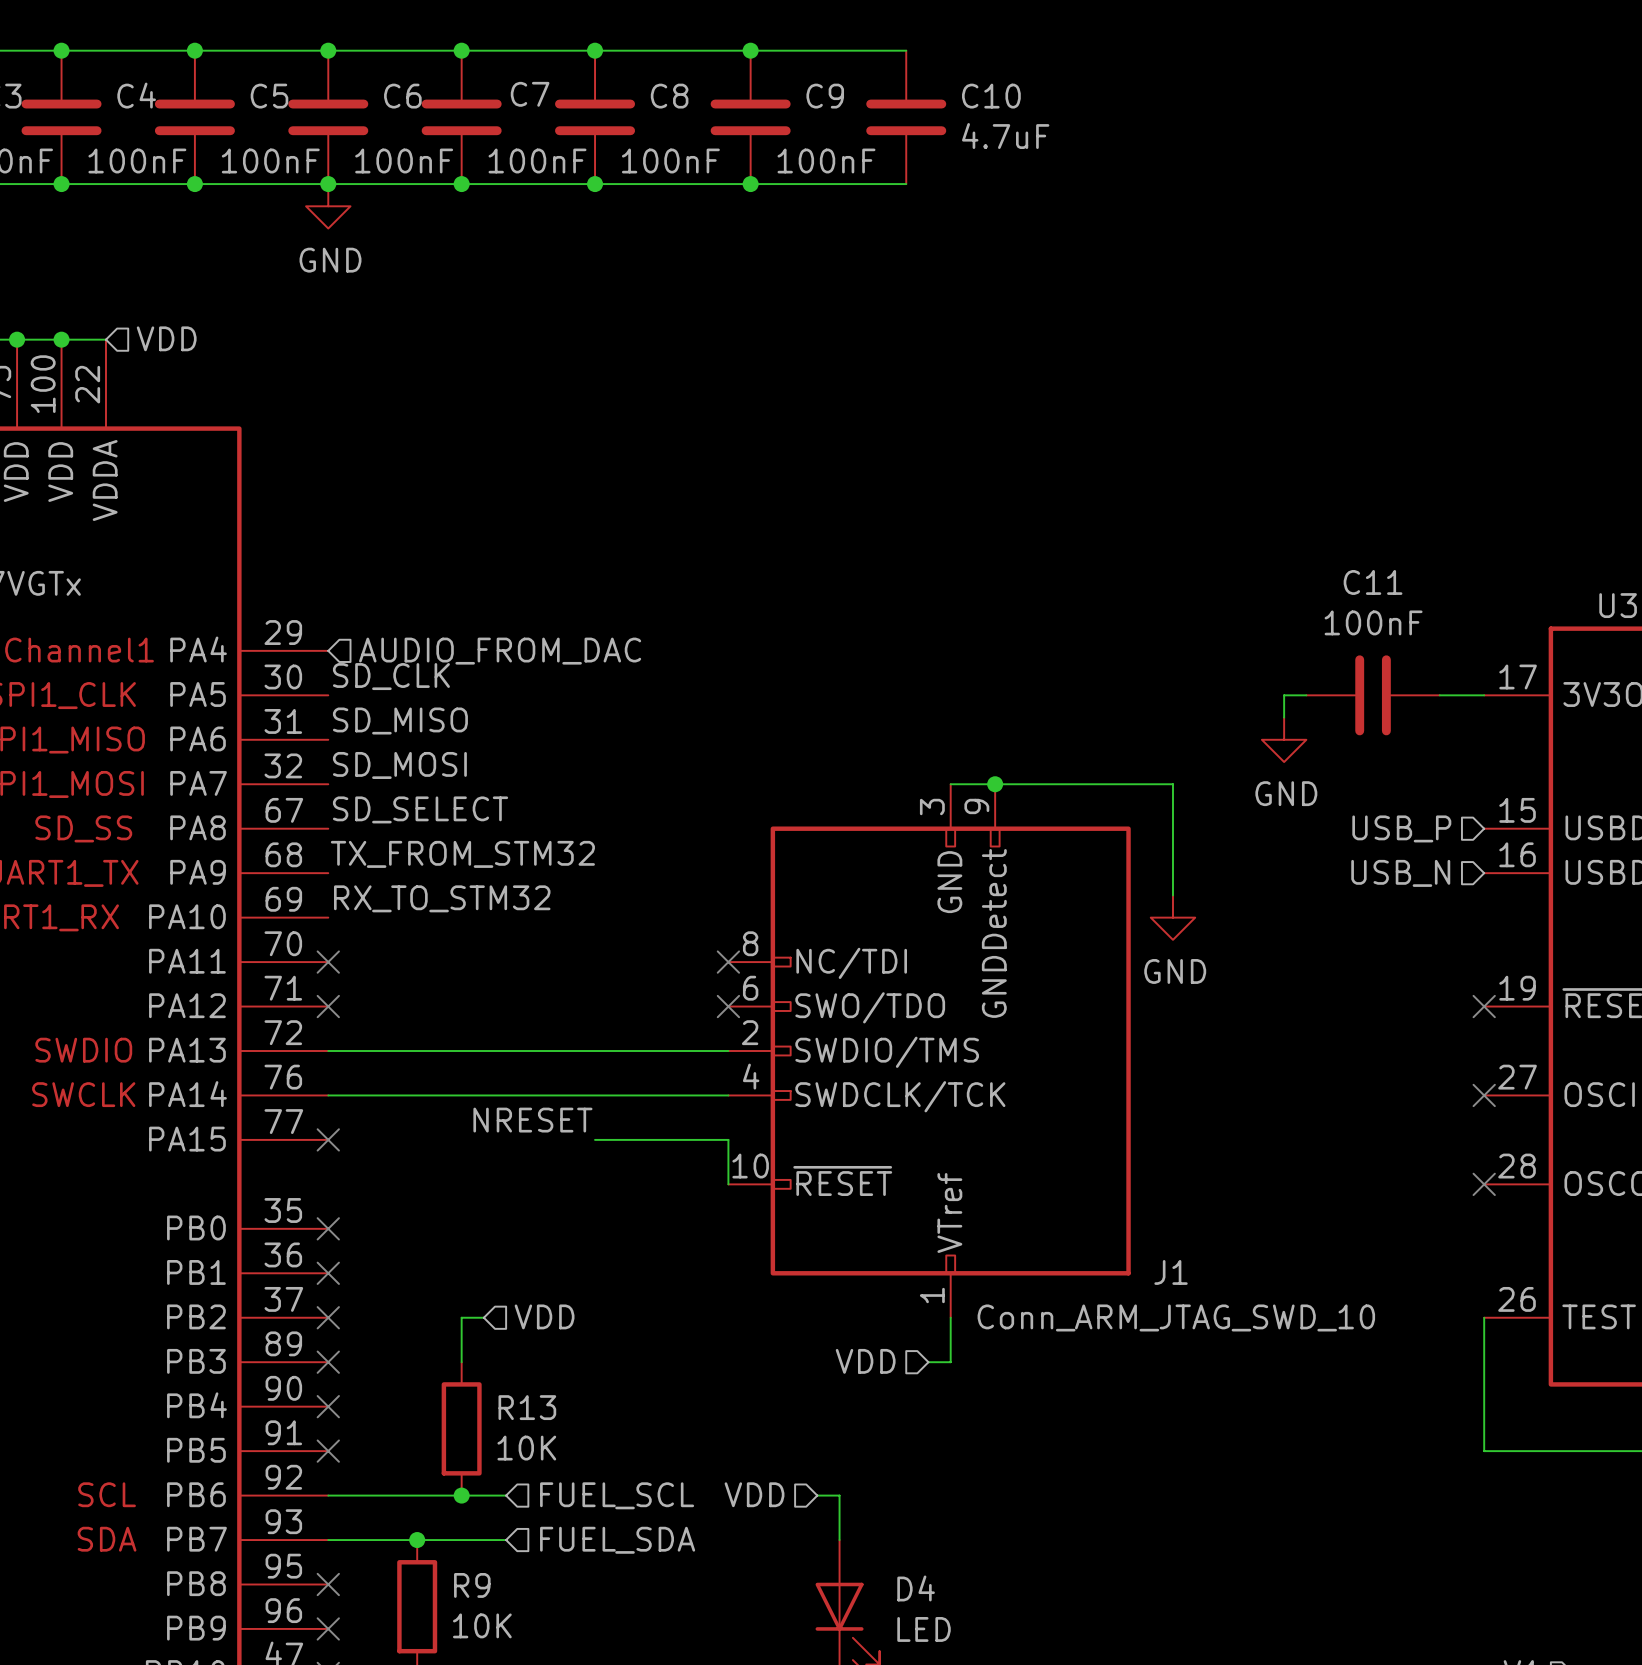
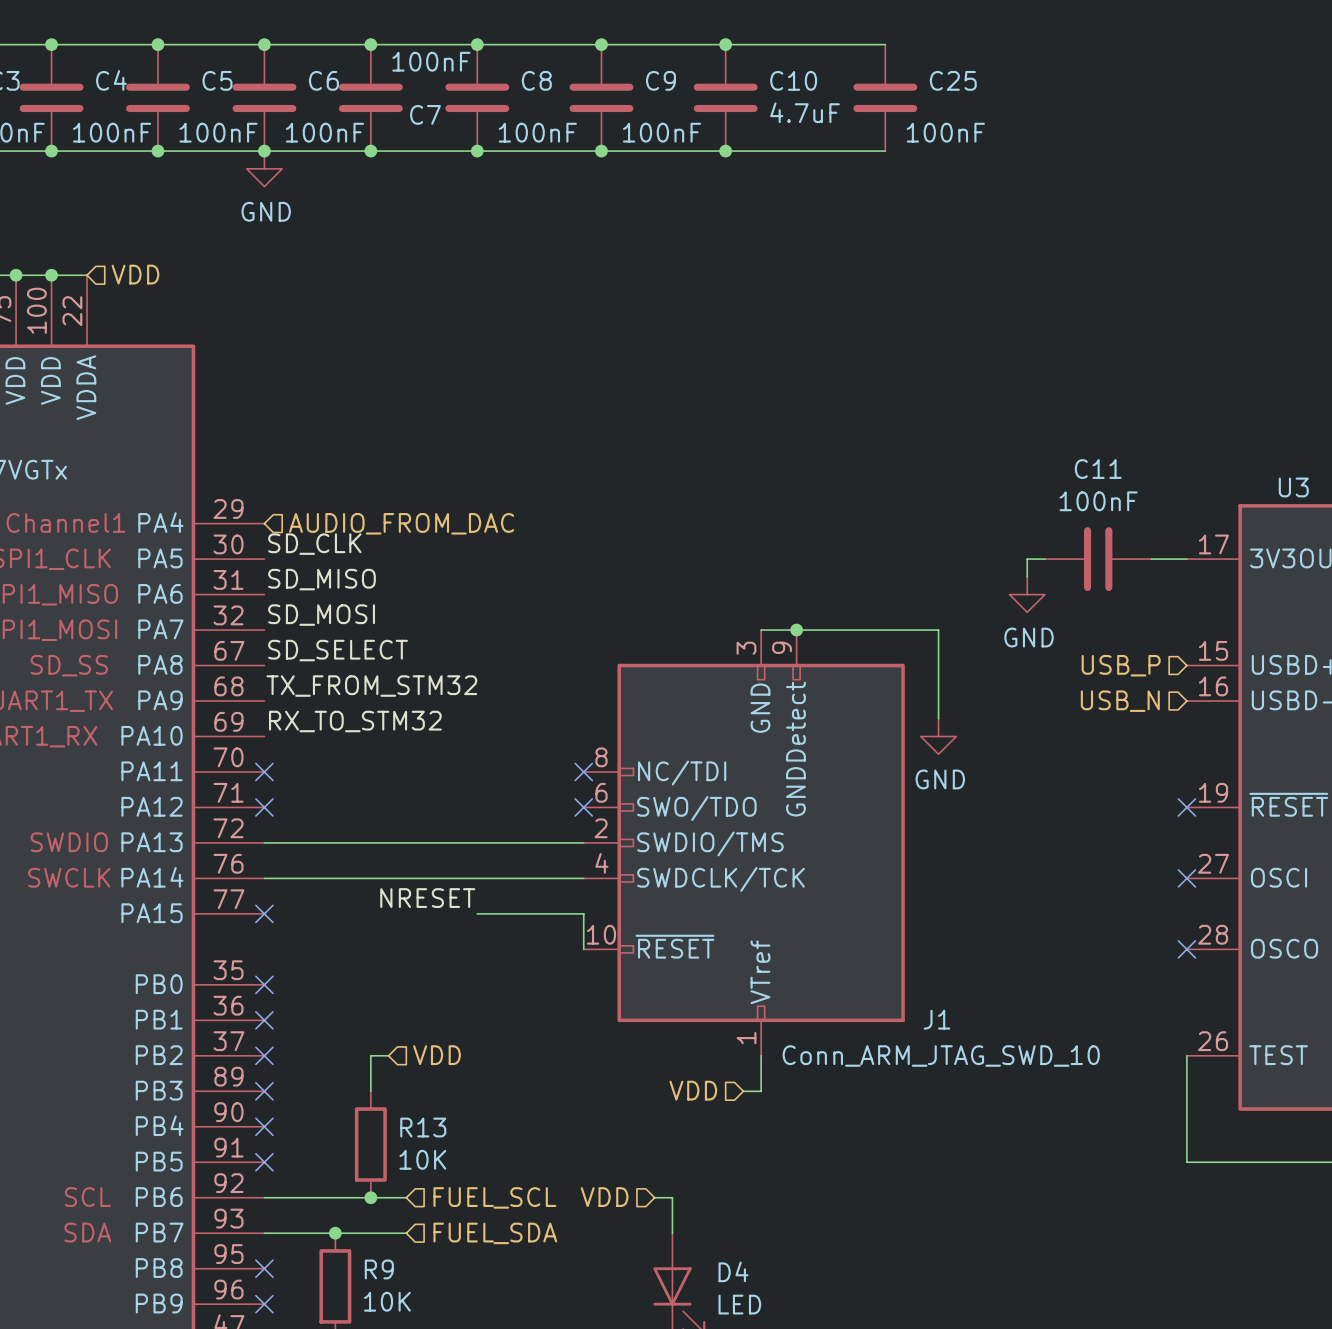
wire: none -> (725, 44) (885, 44)
junction: none -> (725, 44)
C7 name position: C7 (530, 94) -> C7 (425, 114)
C25: none -> 100nF (885, 97)
C7 value position: 100nF (537, 161) -> 100nF (431, 61)
wire: none -> (725, 151) (885, 151)
junction: none -> (725, 151)

